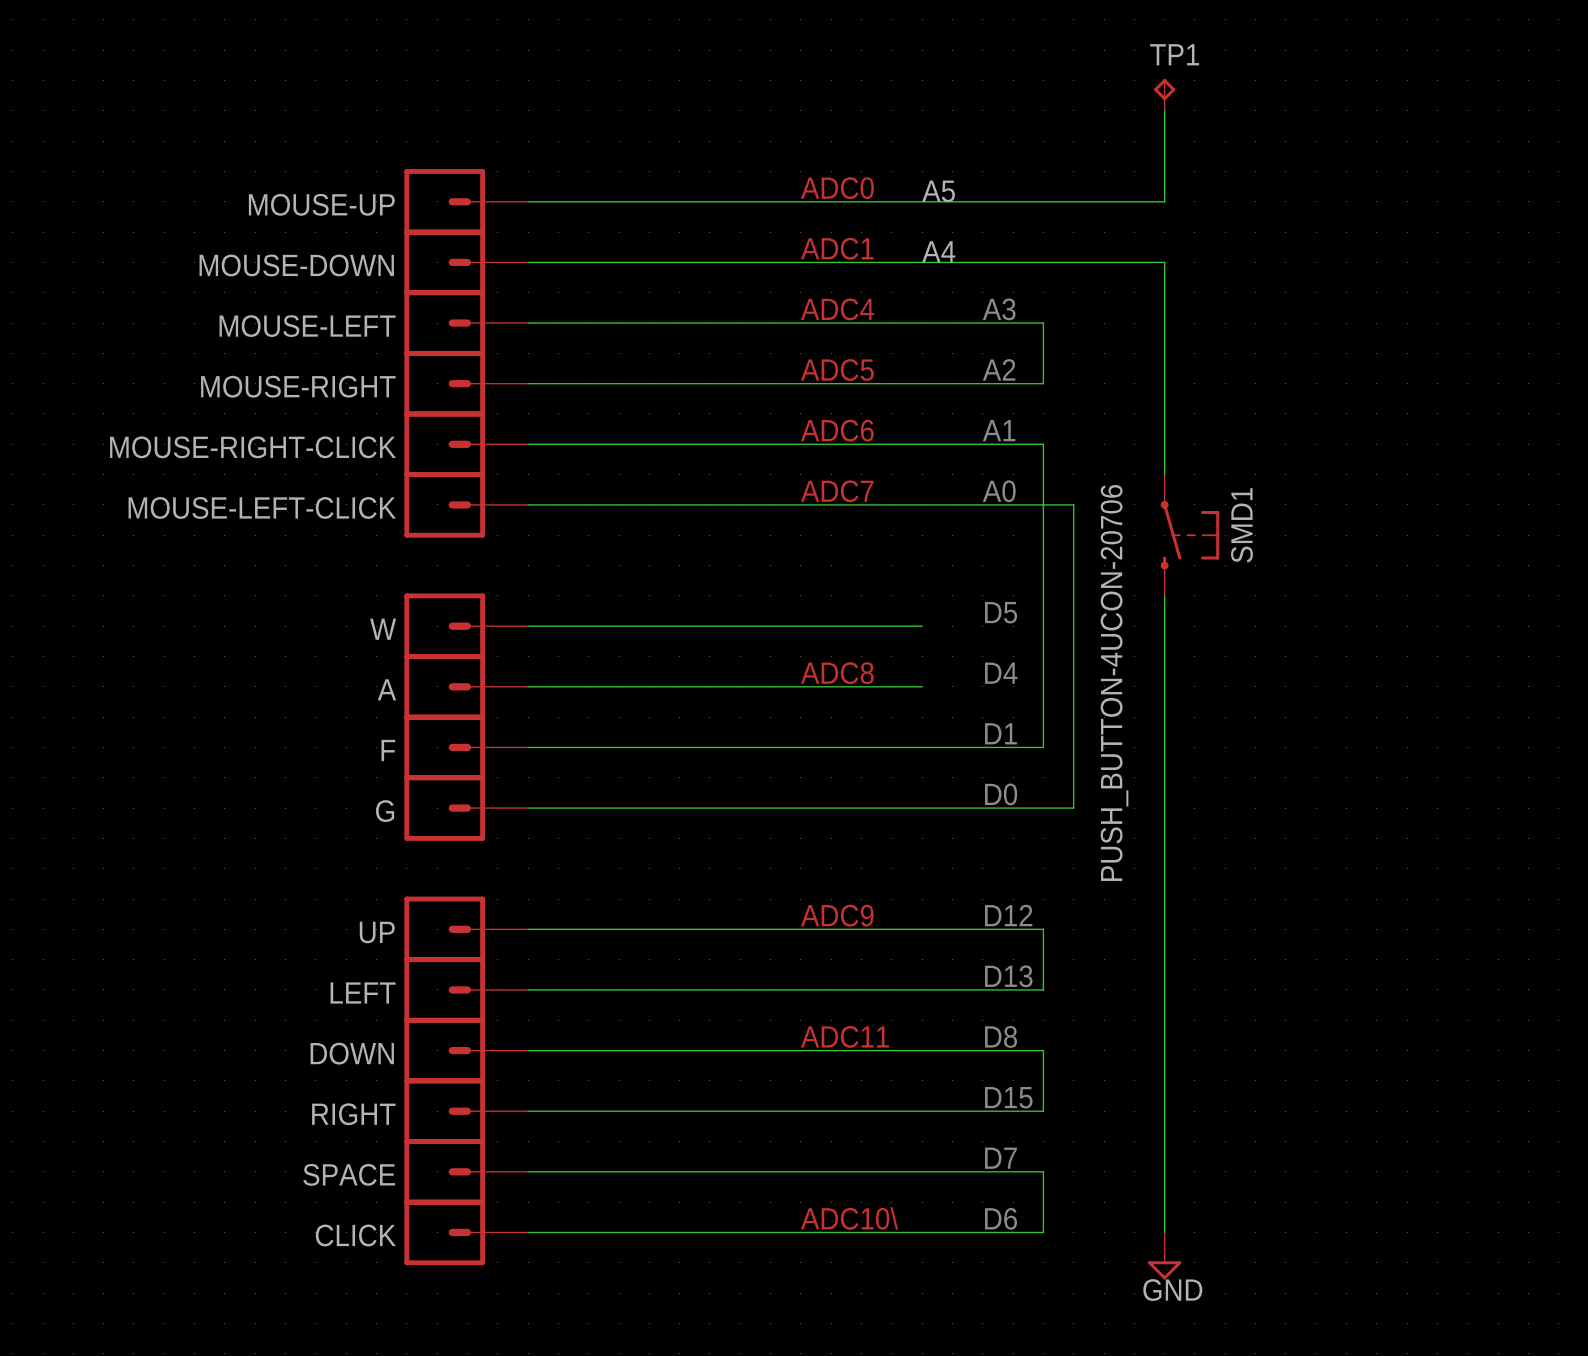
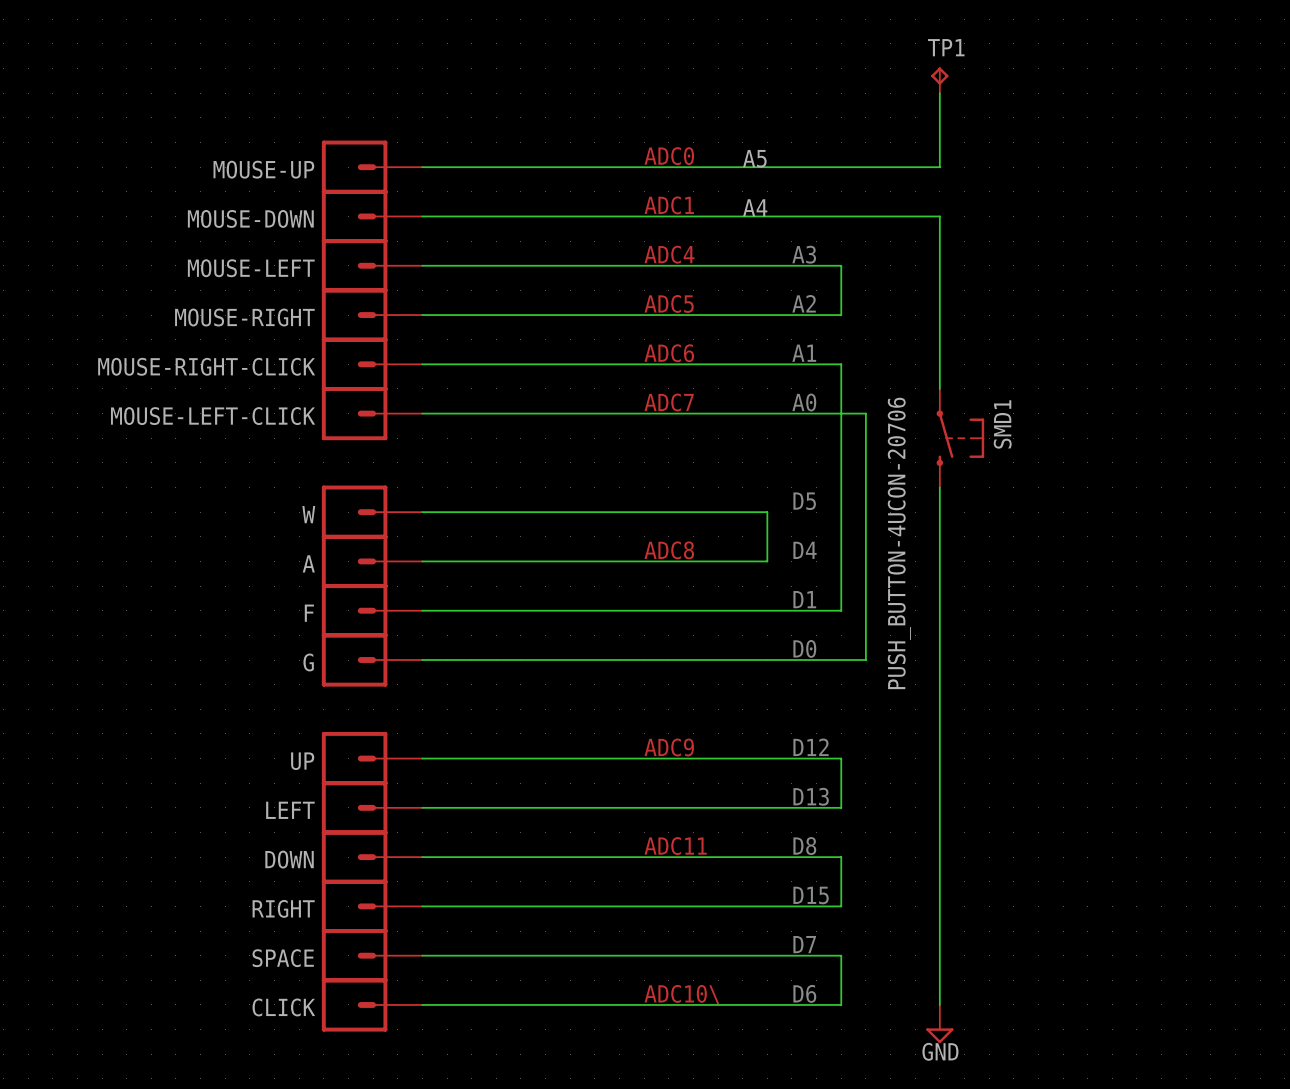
wire: none -> (742, 512) (767, 512) (767, 561) (742, 561)

